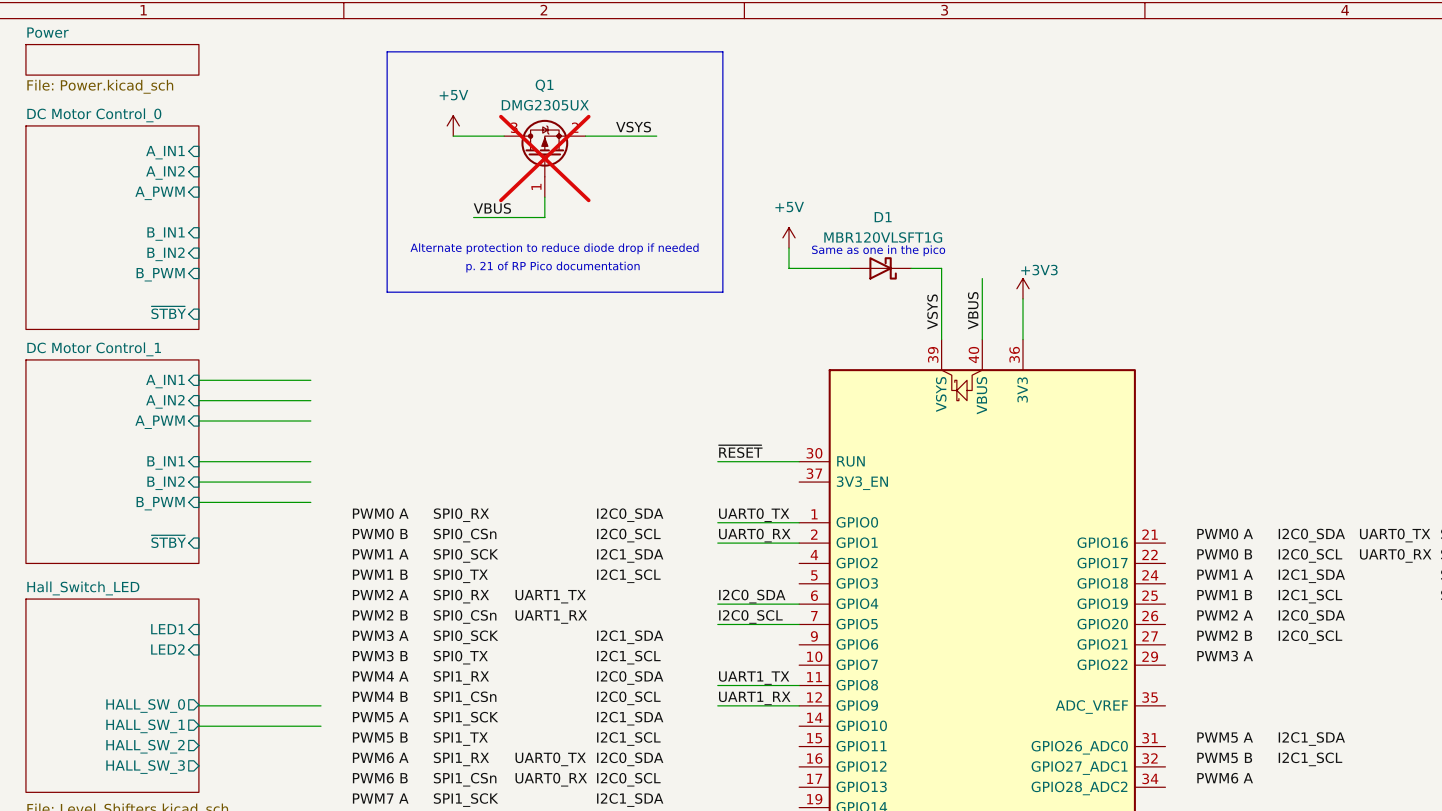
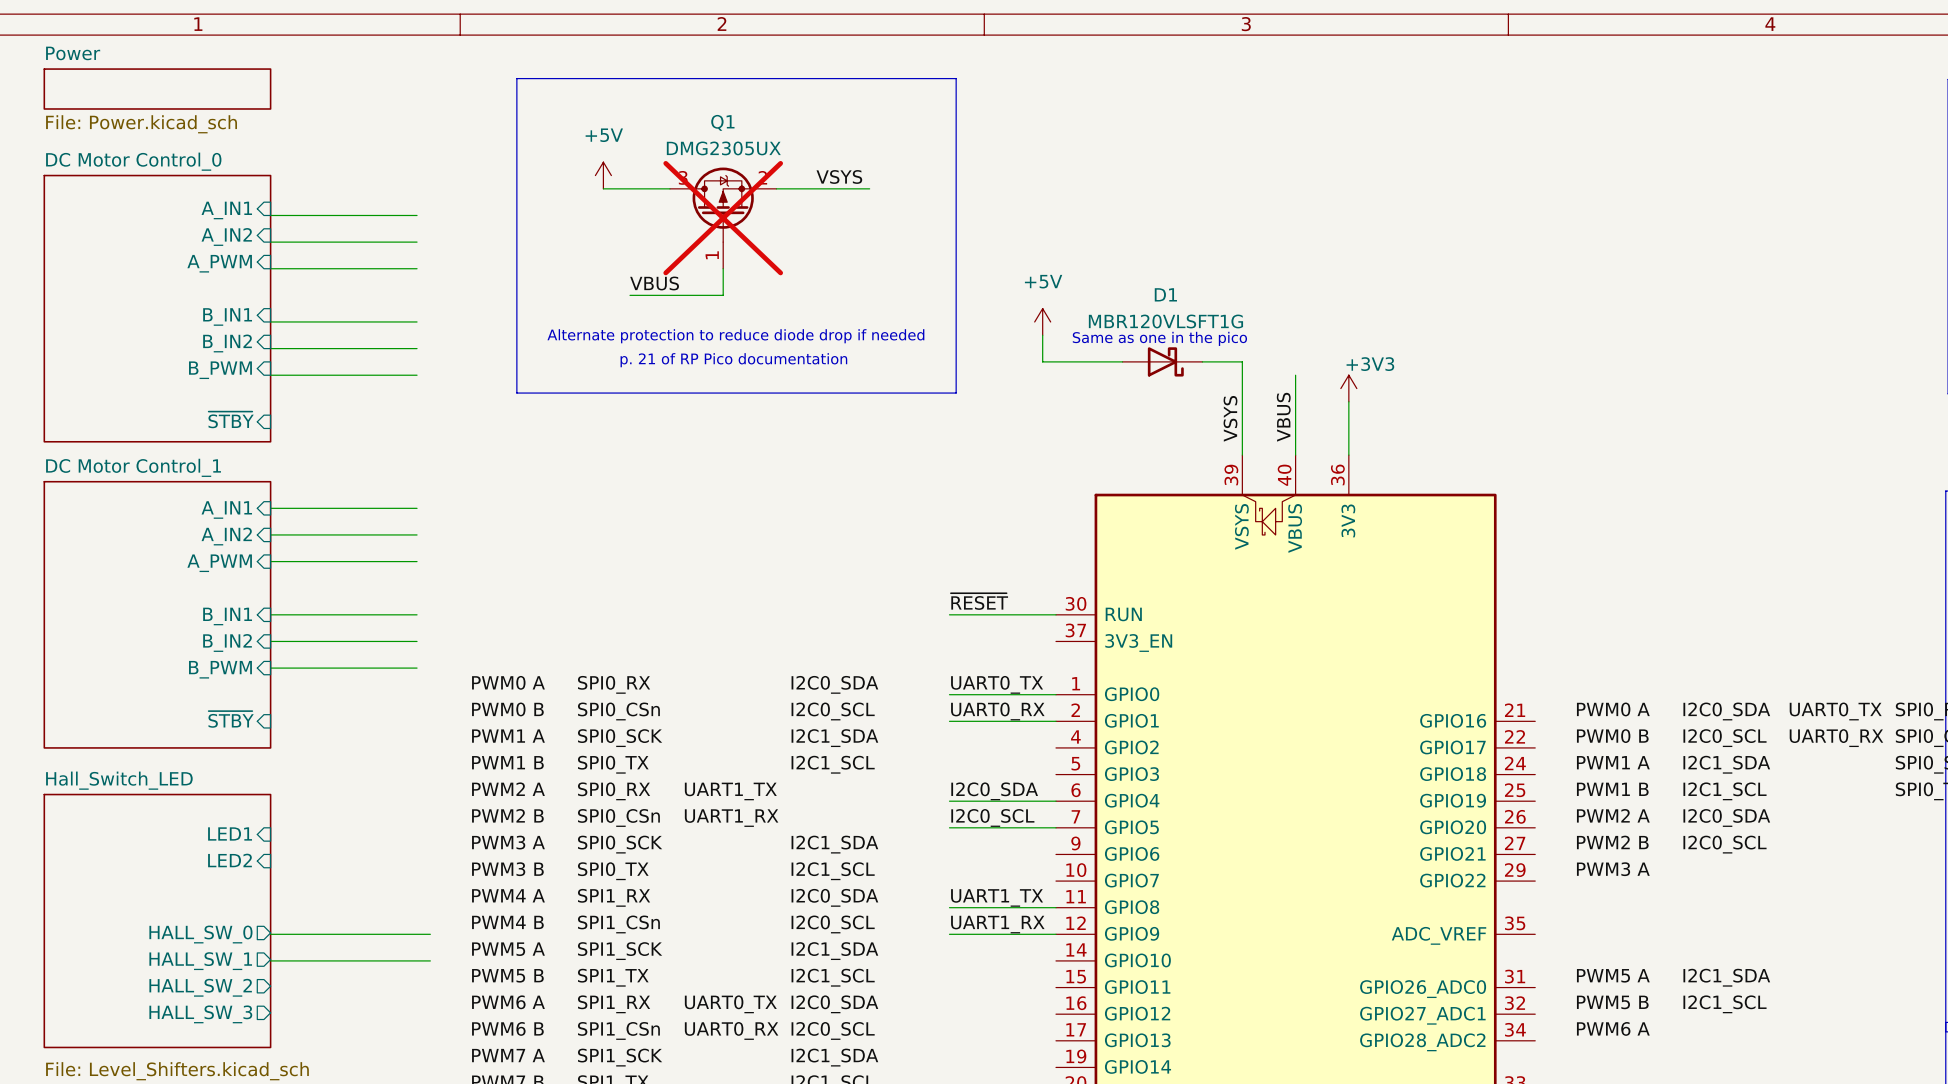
wire: none -> (270, 215) (417, 215)
wire: none -> (270, 242) (417, 242)
wire: none -> (270, 268) (417, 268)
wire: none -> (270, 321) (417, 321)
wire: none -> (270, 348) (417, 348)
wire: none -> (270, 375) (417, 375)

